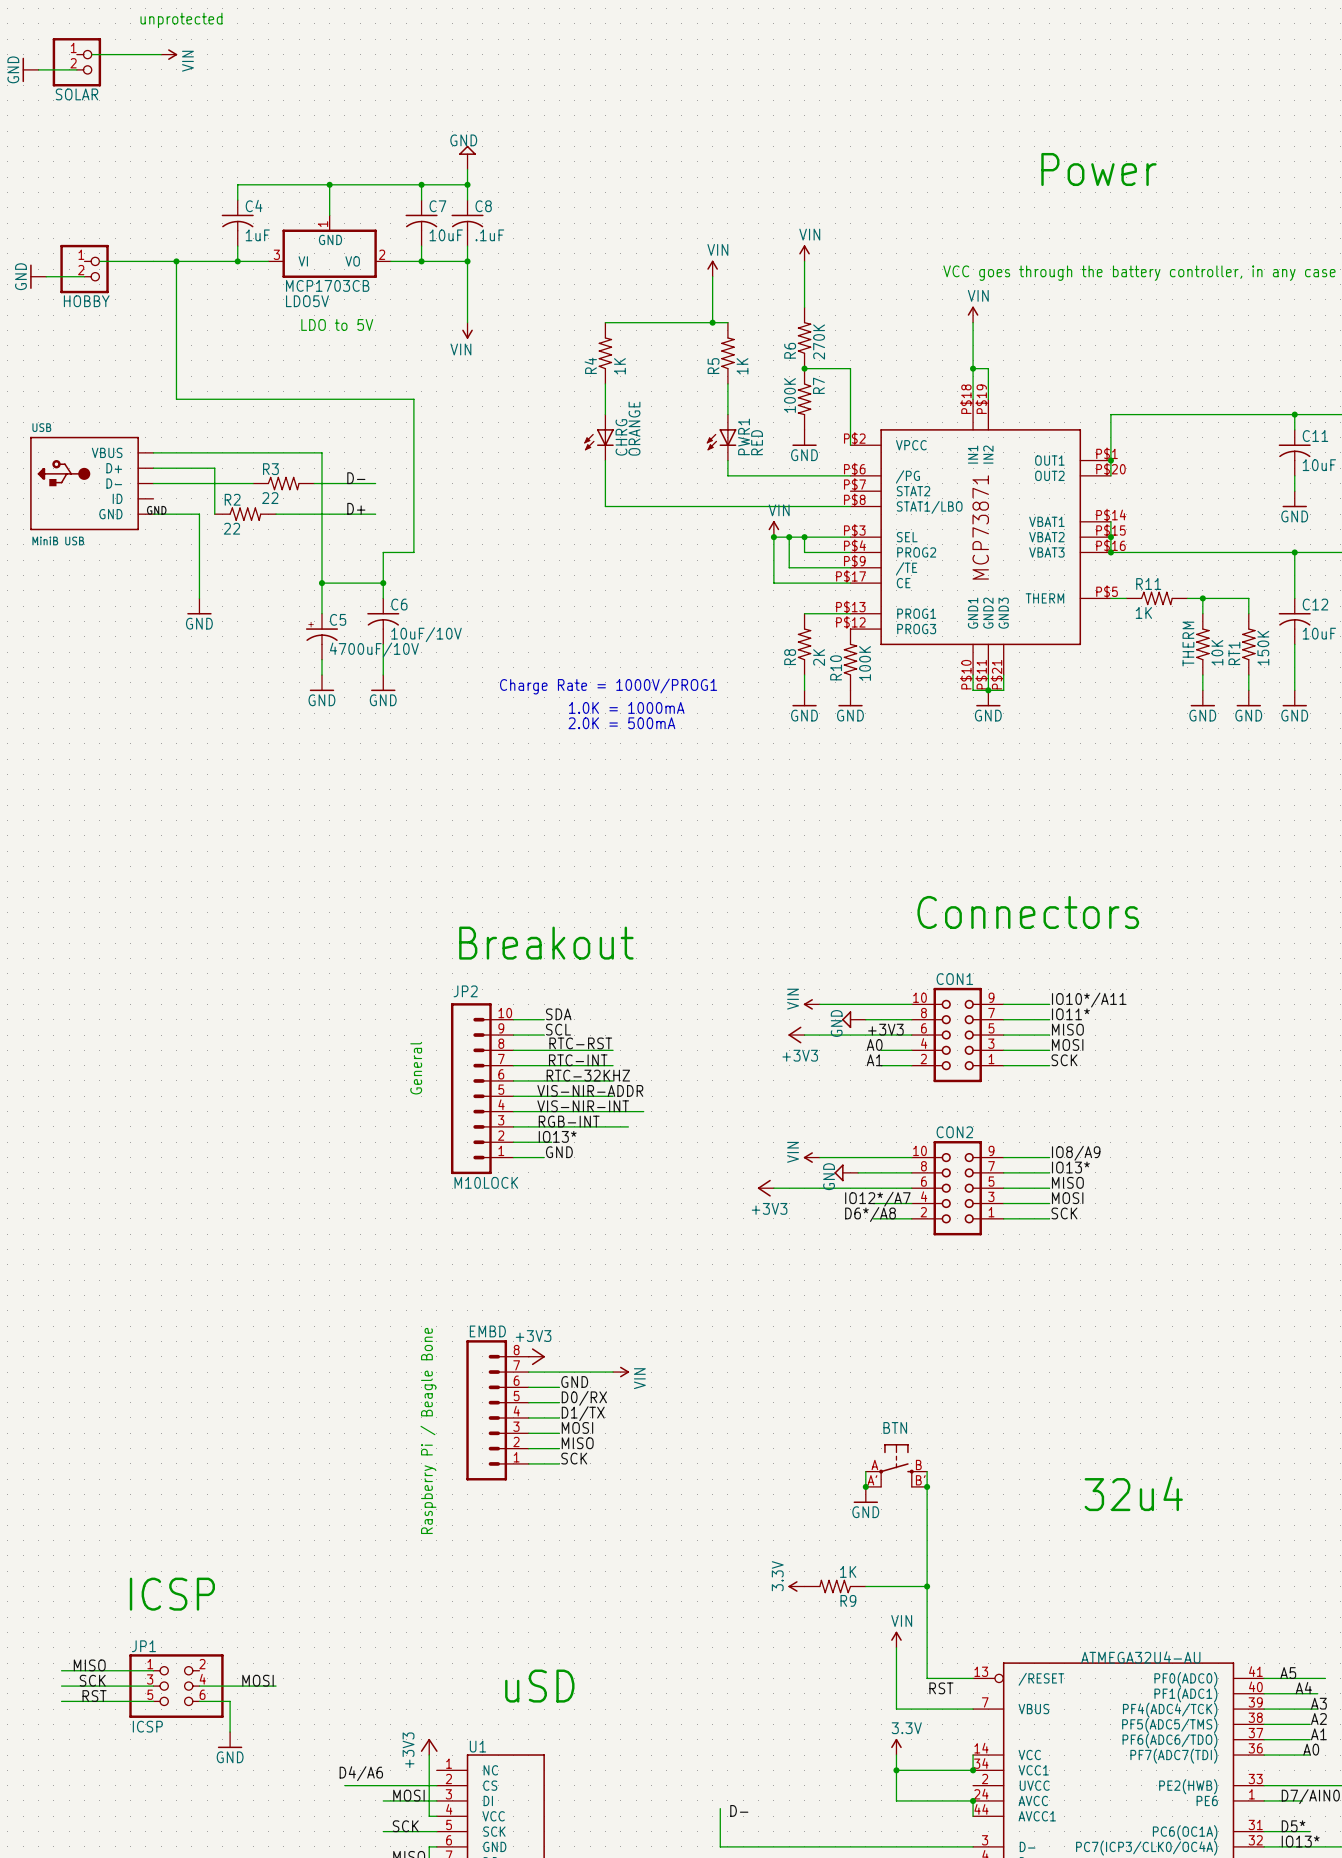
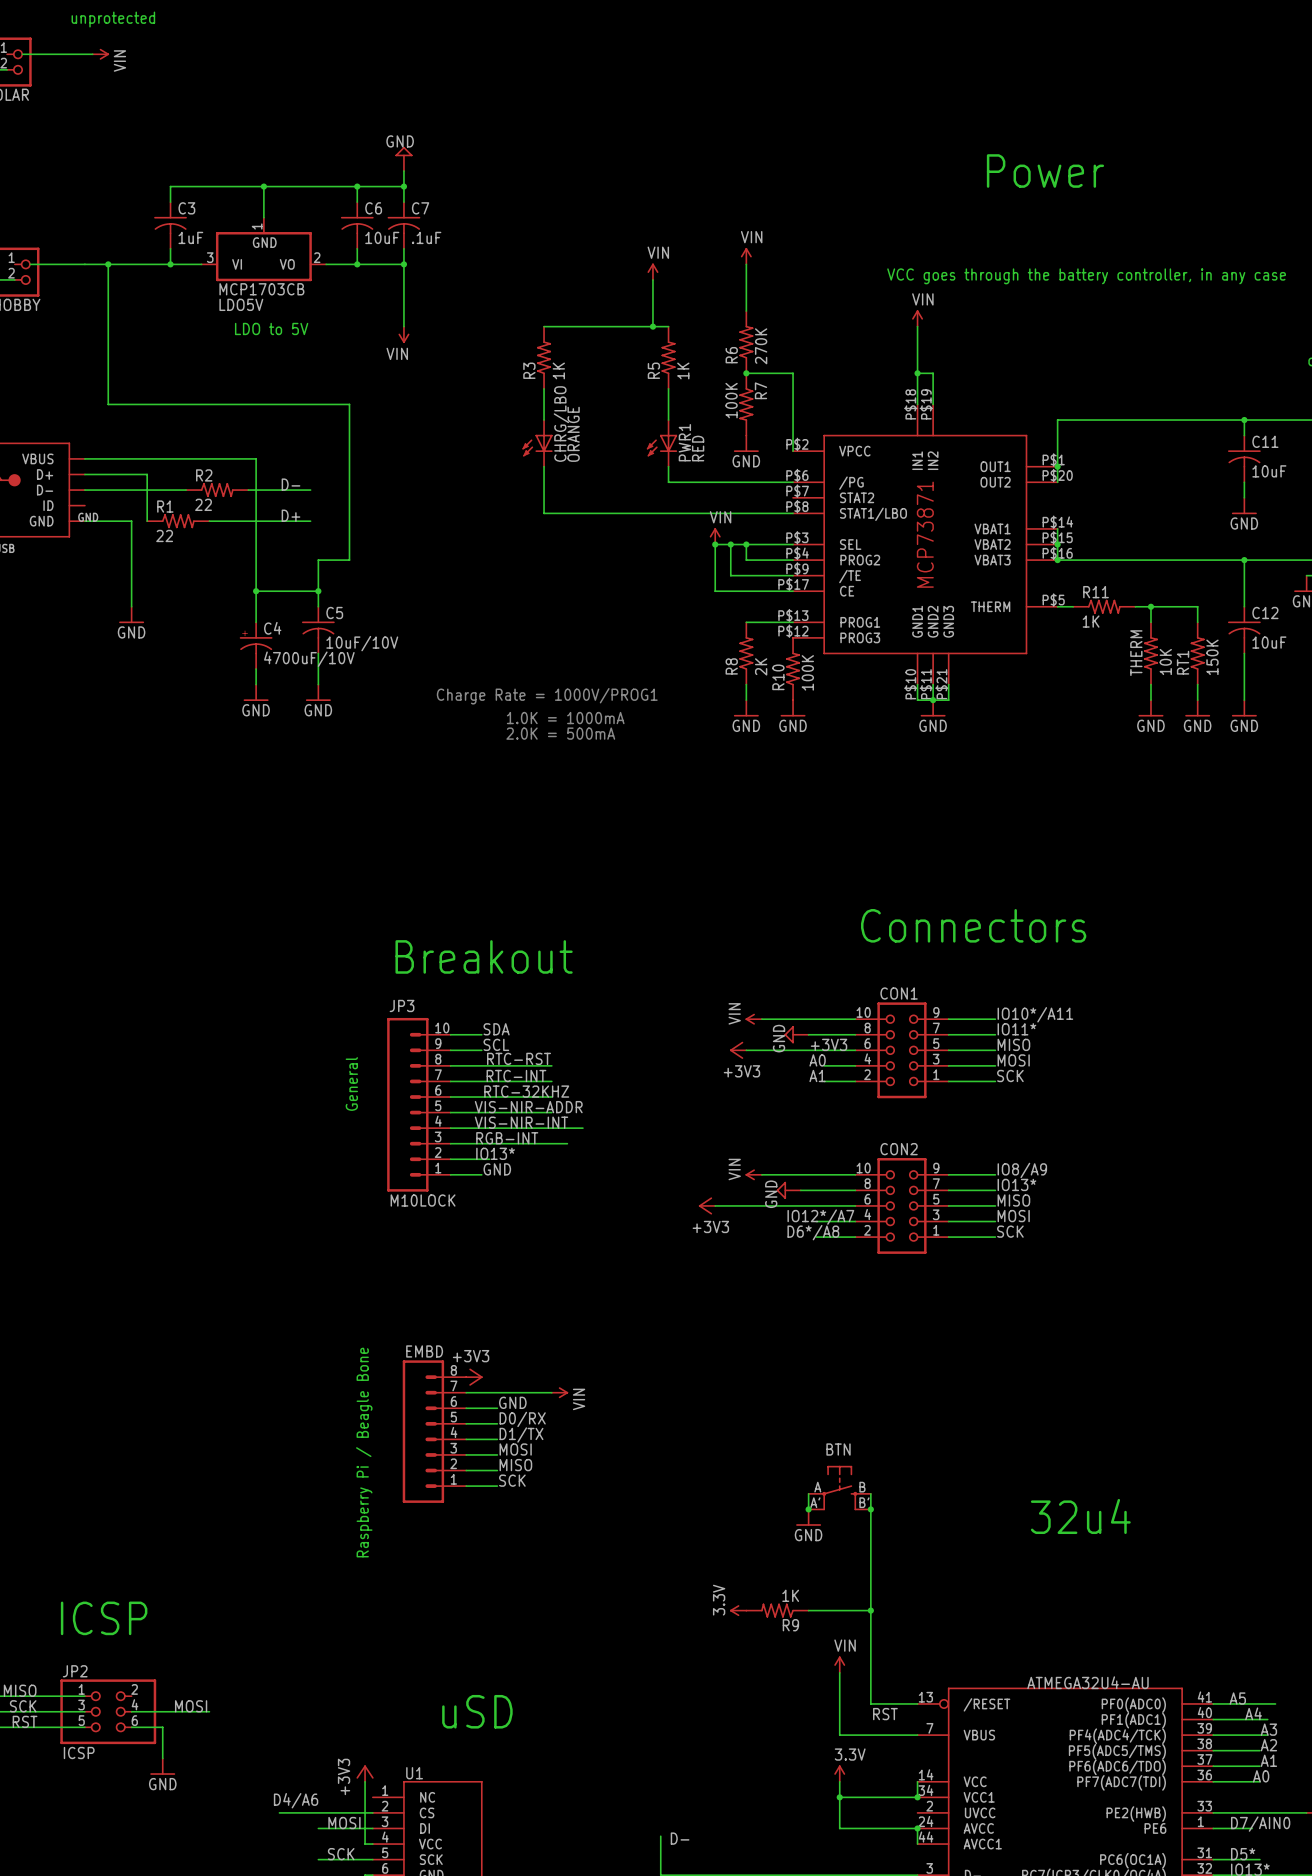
C4 name: C4 (254, 206) -> C3 (186, 208)
C7 name: C7 (437, 206) -> C6 (373, 208)
C8 name: C8 (483, 206) -> C7 (420, 208)
R4 name: R4 (590, 365) -> R3 (529, 370)
CHRG name: CHRG (621, 437) -> CHRG/LBO (561, 424)
R3 name: R3 (270, 469) -> R2 (204, 475)
R2 name: R2 (232, 499) -> R1 (165, 506)
C6 name: C6 (399, 604) -> C5 (334, 613)
C5 name: C5 (338, 619) -> C4 (272, 628)
JP2 name: JP2 (465, 991) -> JP3 (402, 1005)
JP1 name: JP1 (143, 1646) -> JP2 (75, 1671)

